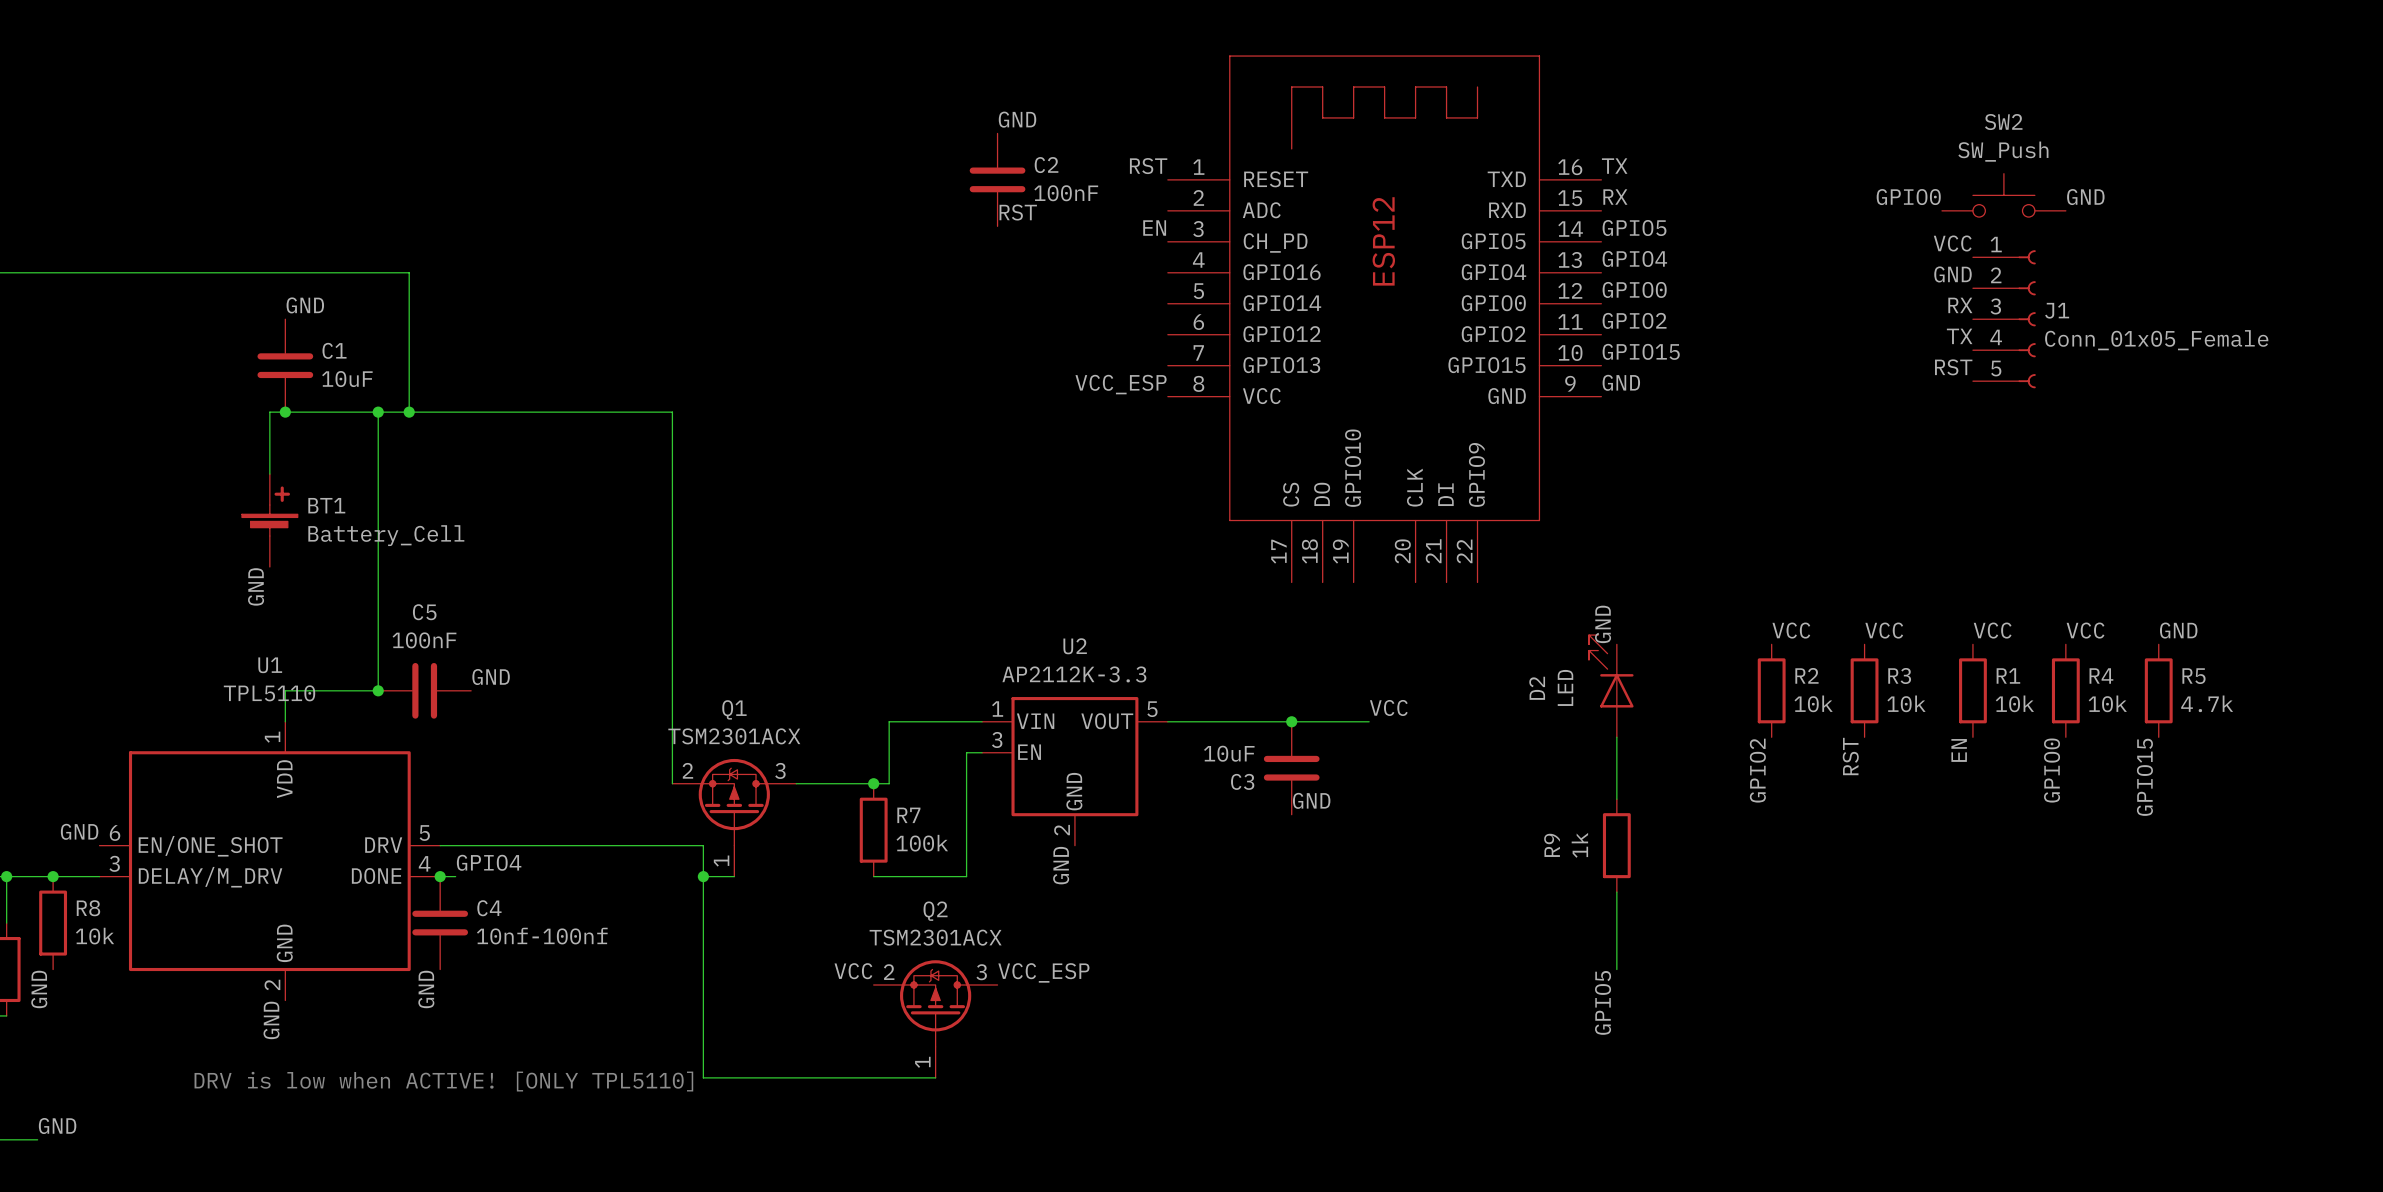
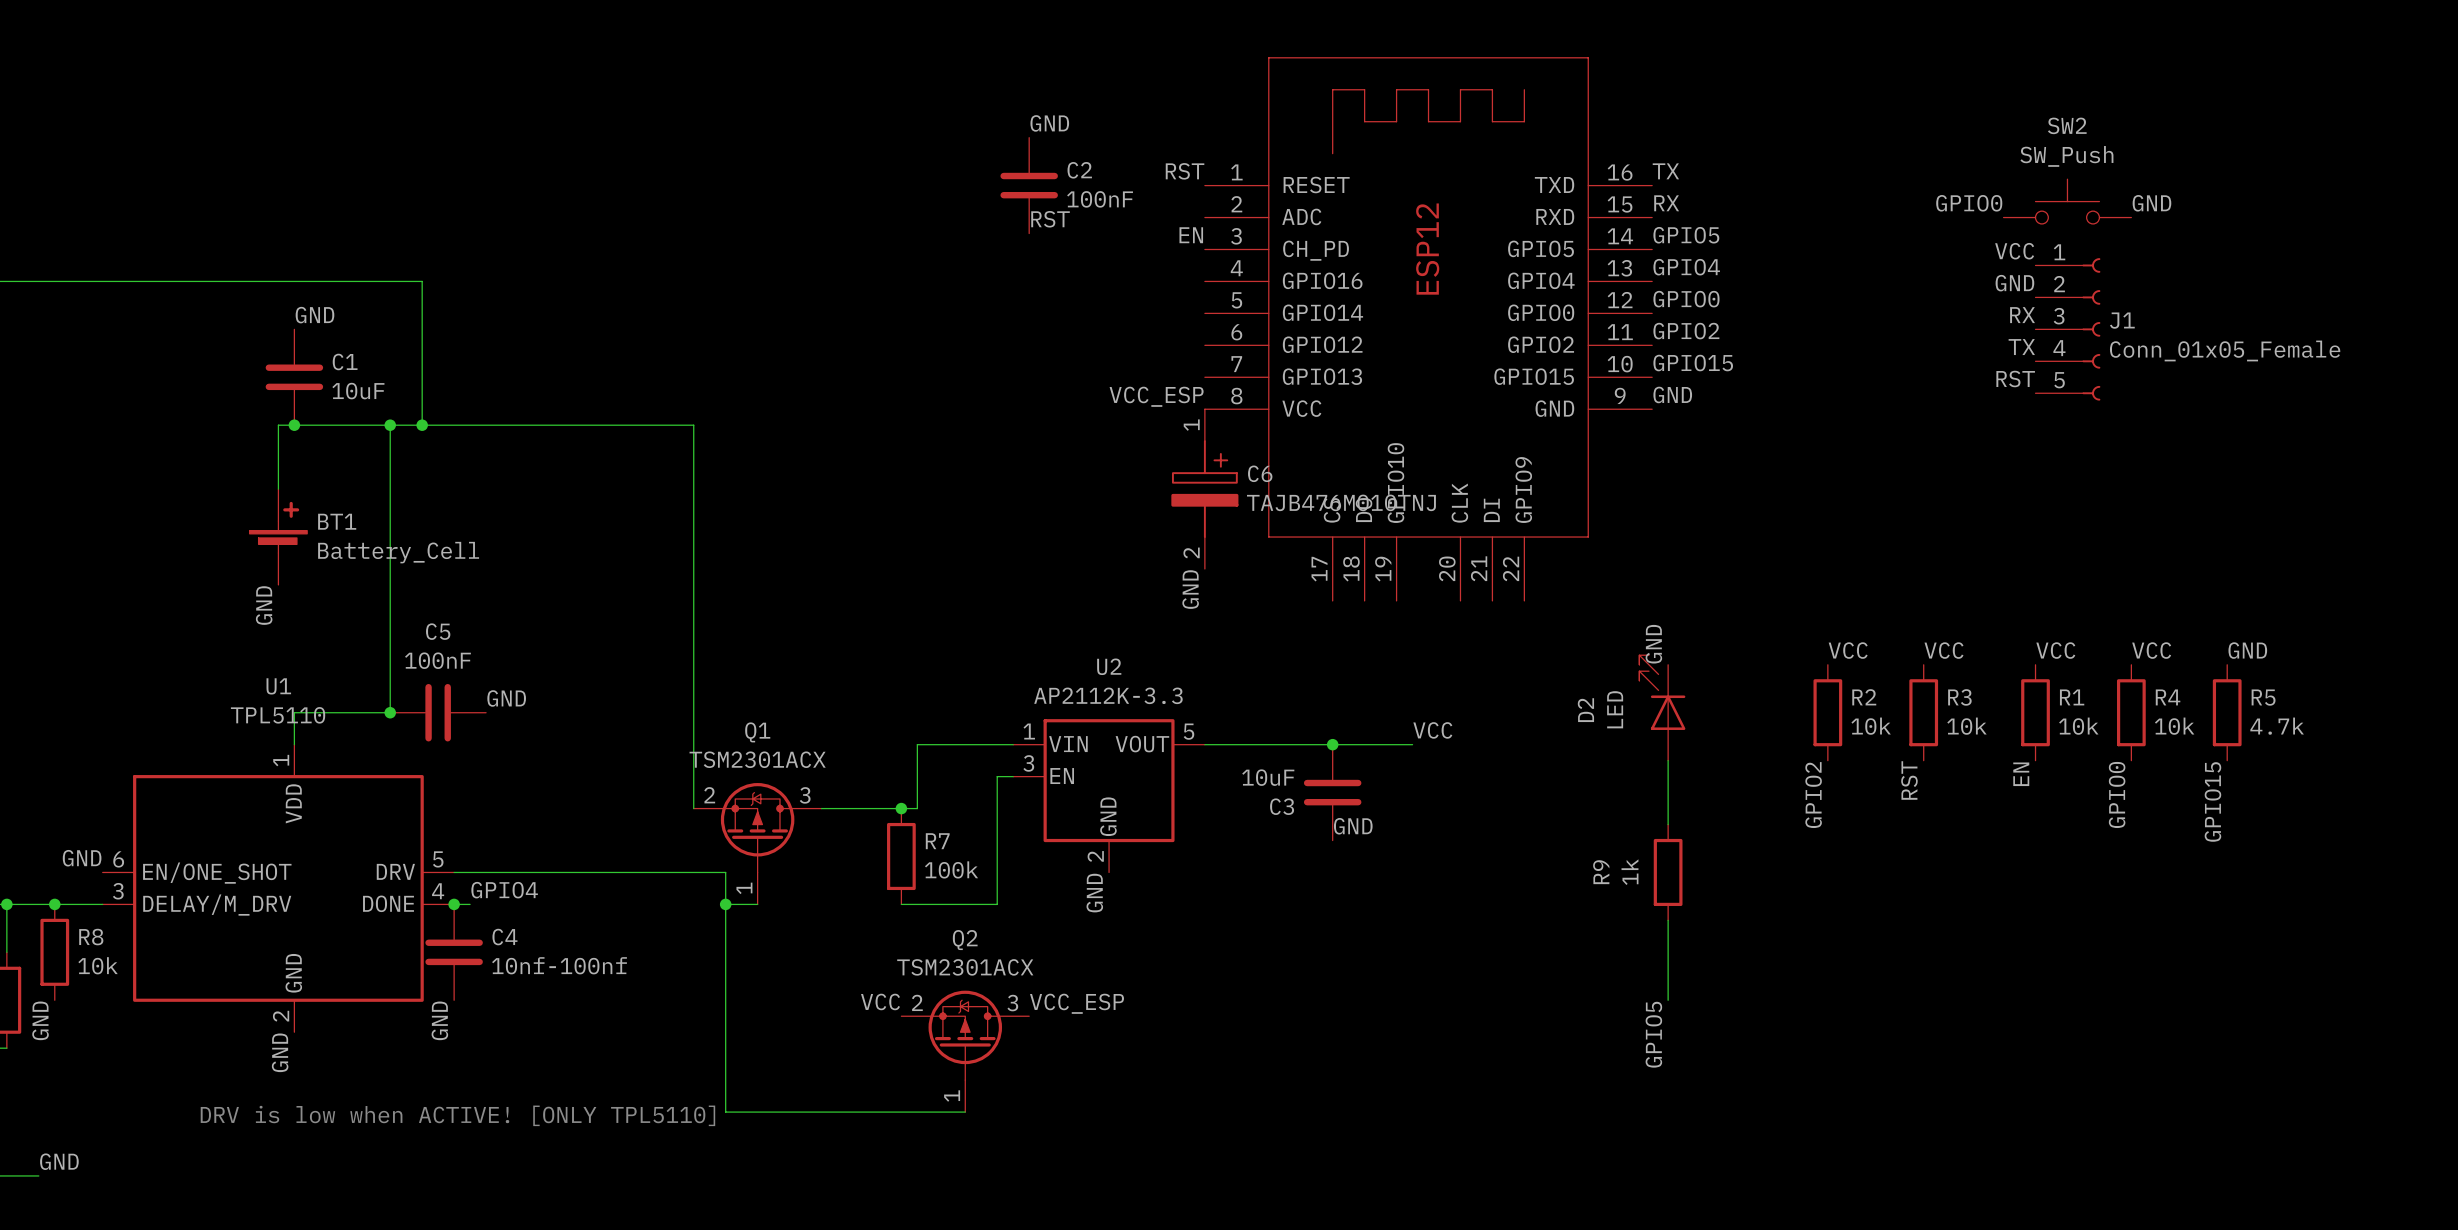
C6: none -> TAJB476M010TNJ (1204, 489)
label: none -> GND (1190, 589)

